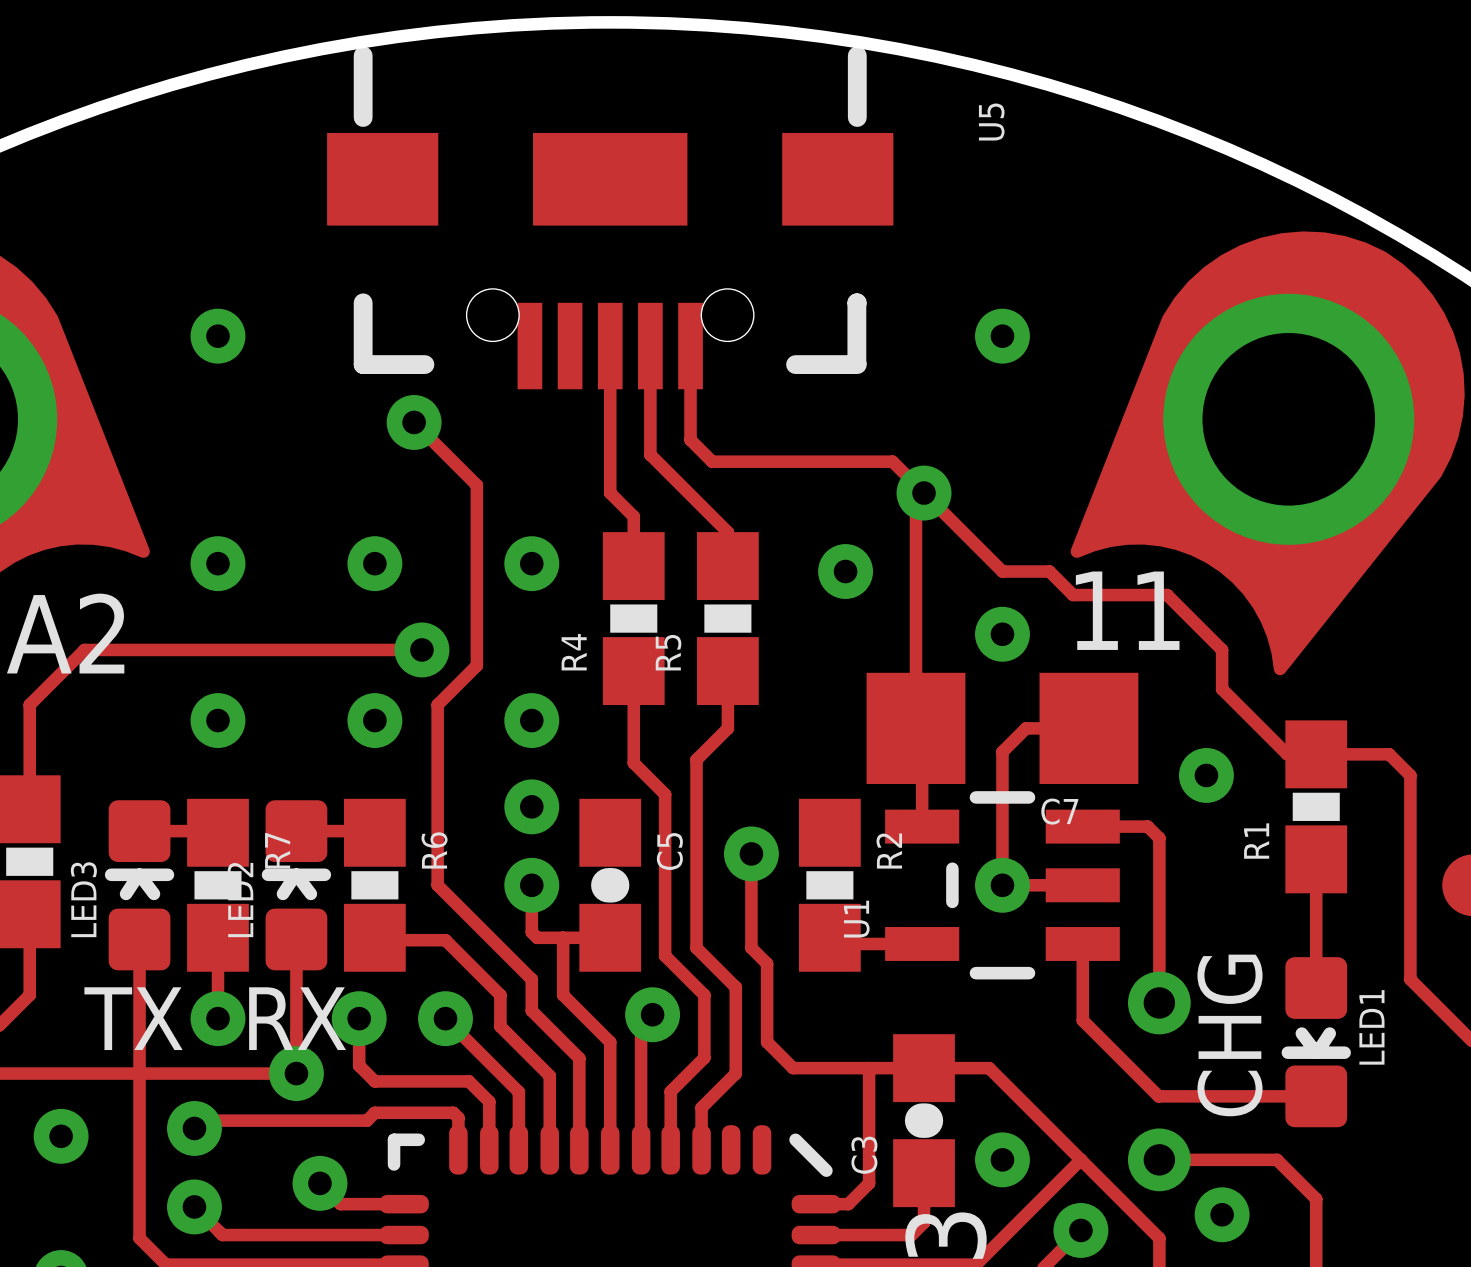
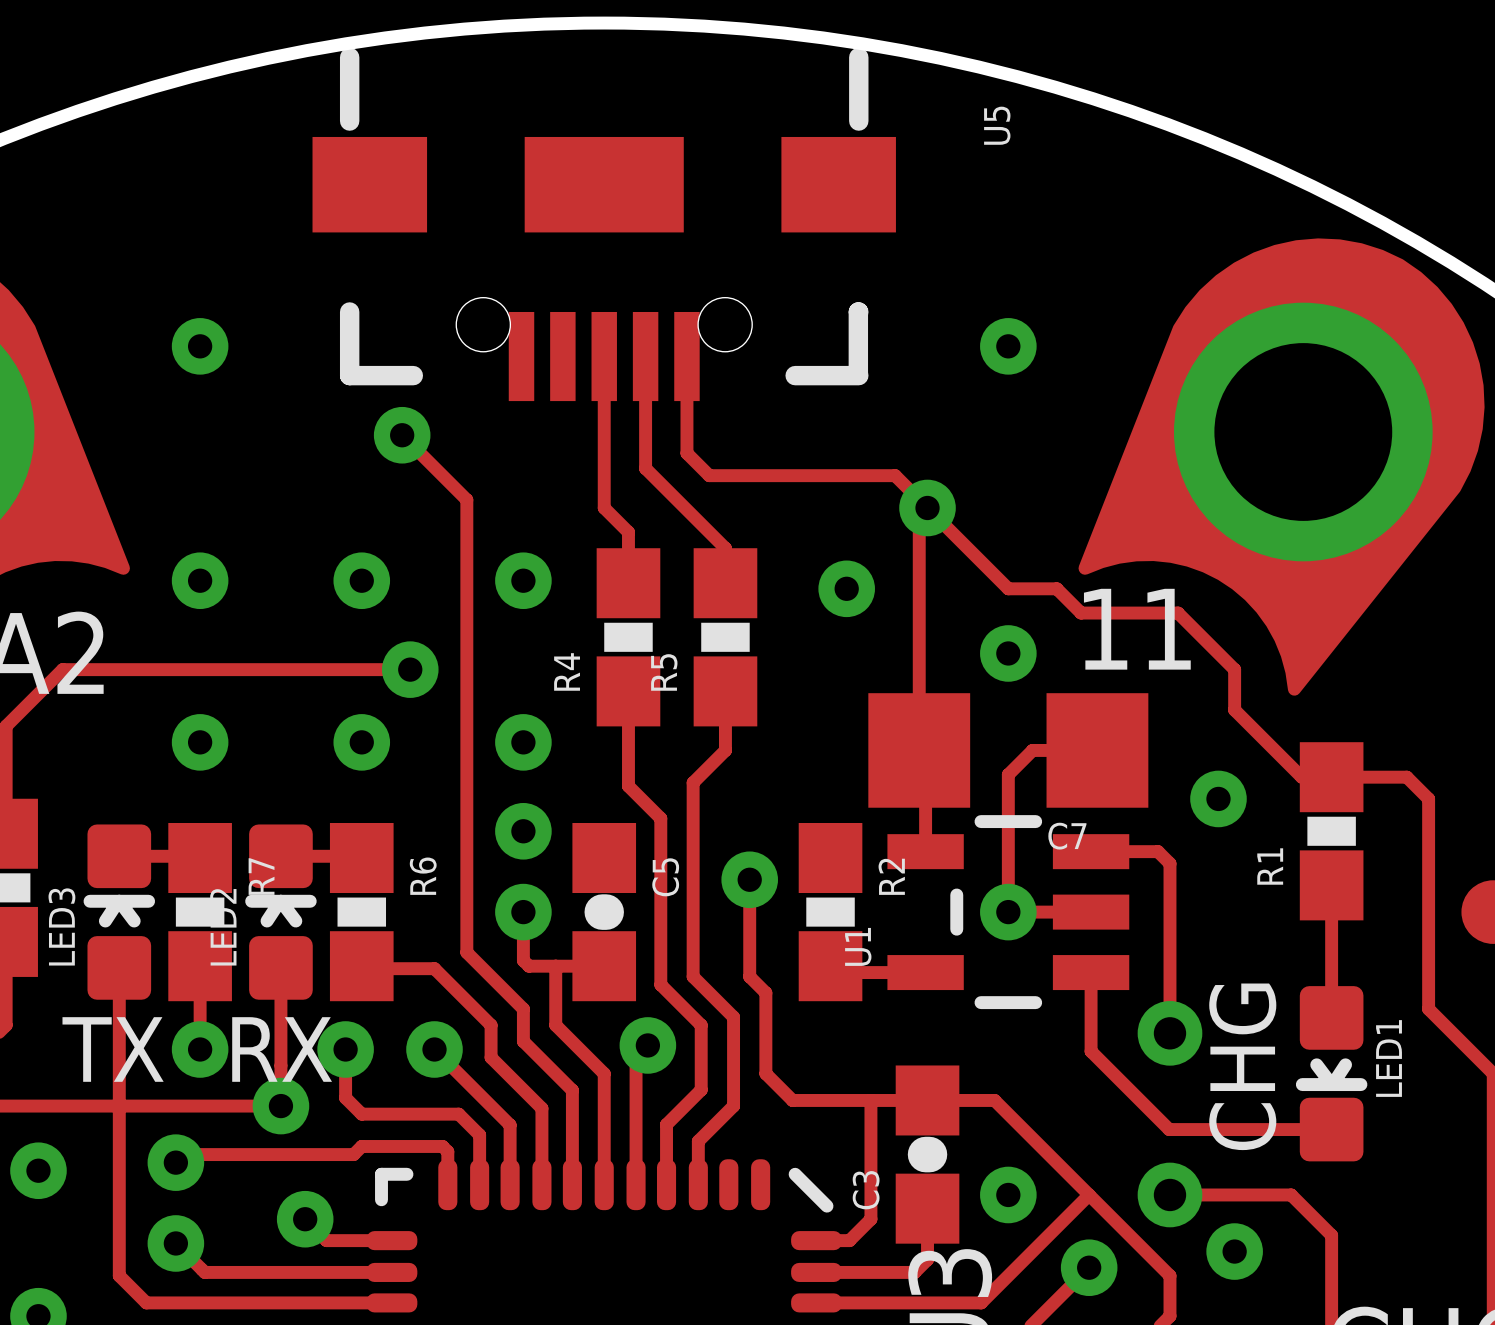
track: (476, 665) (437, 704) (437, 885) (476, 924) -> (466, 685) (466, 952)

